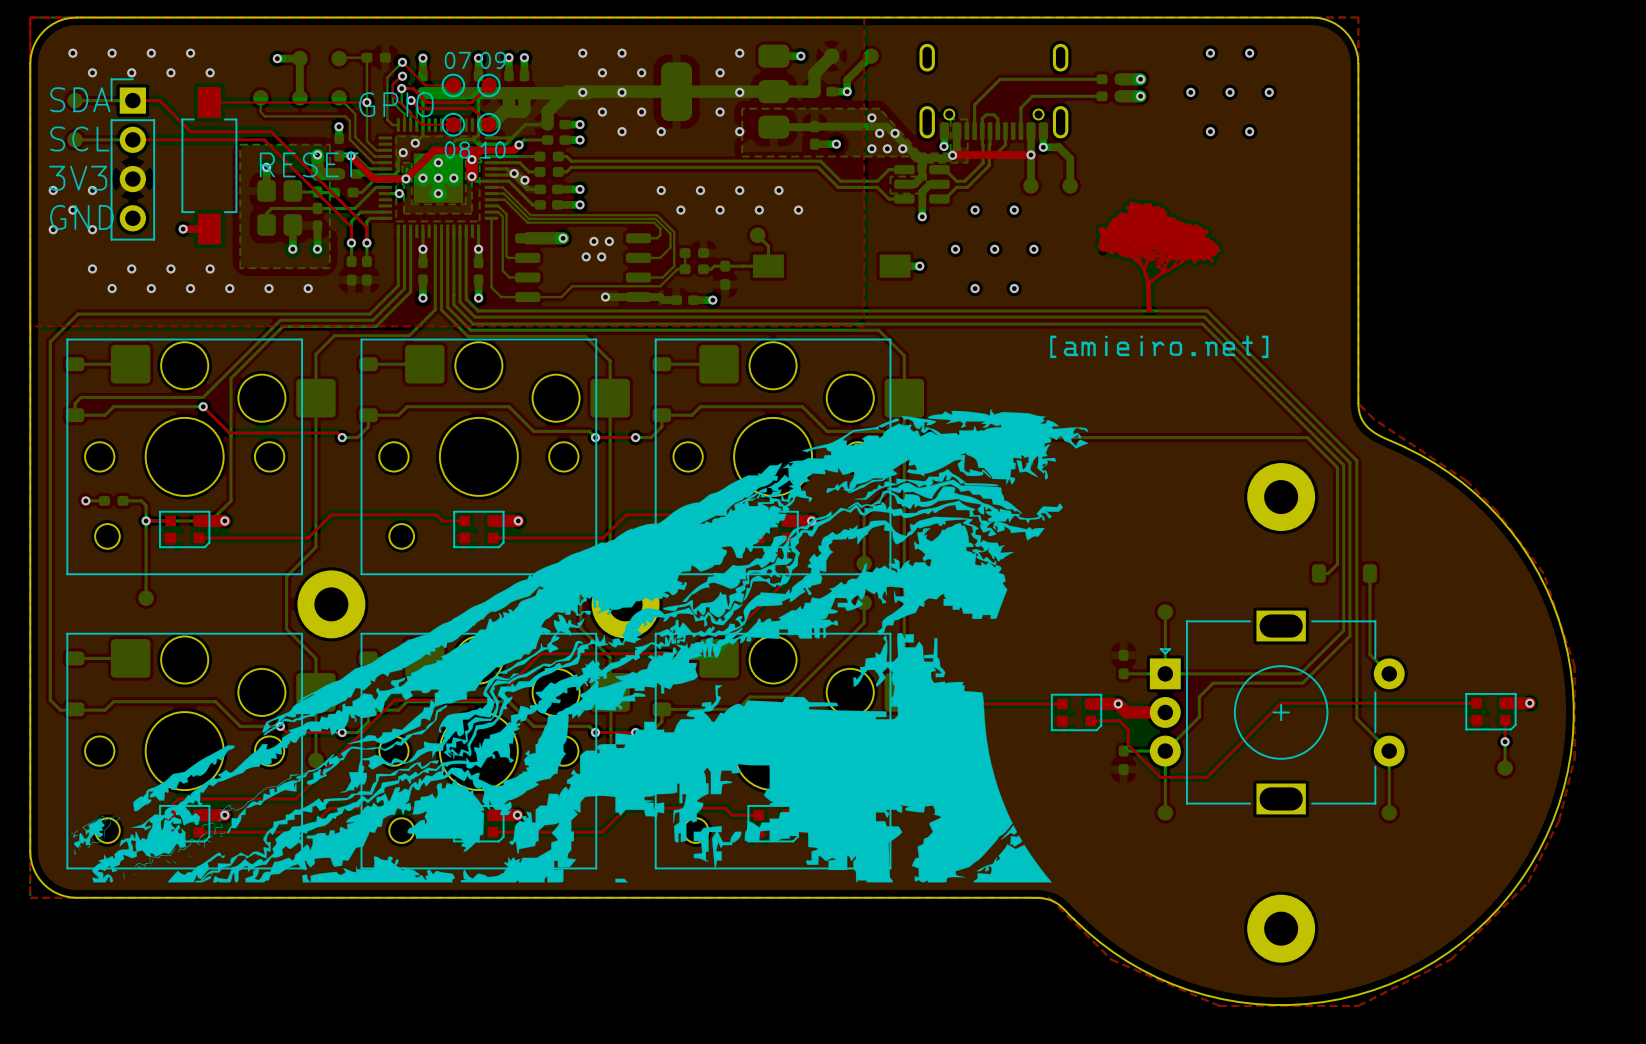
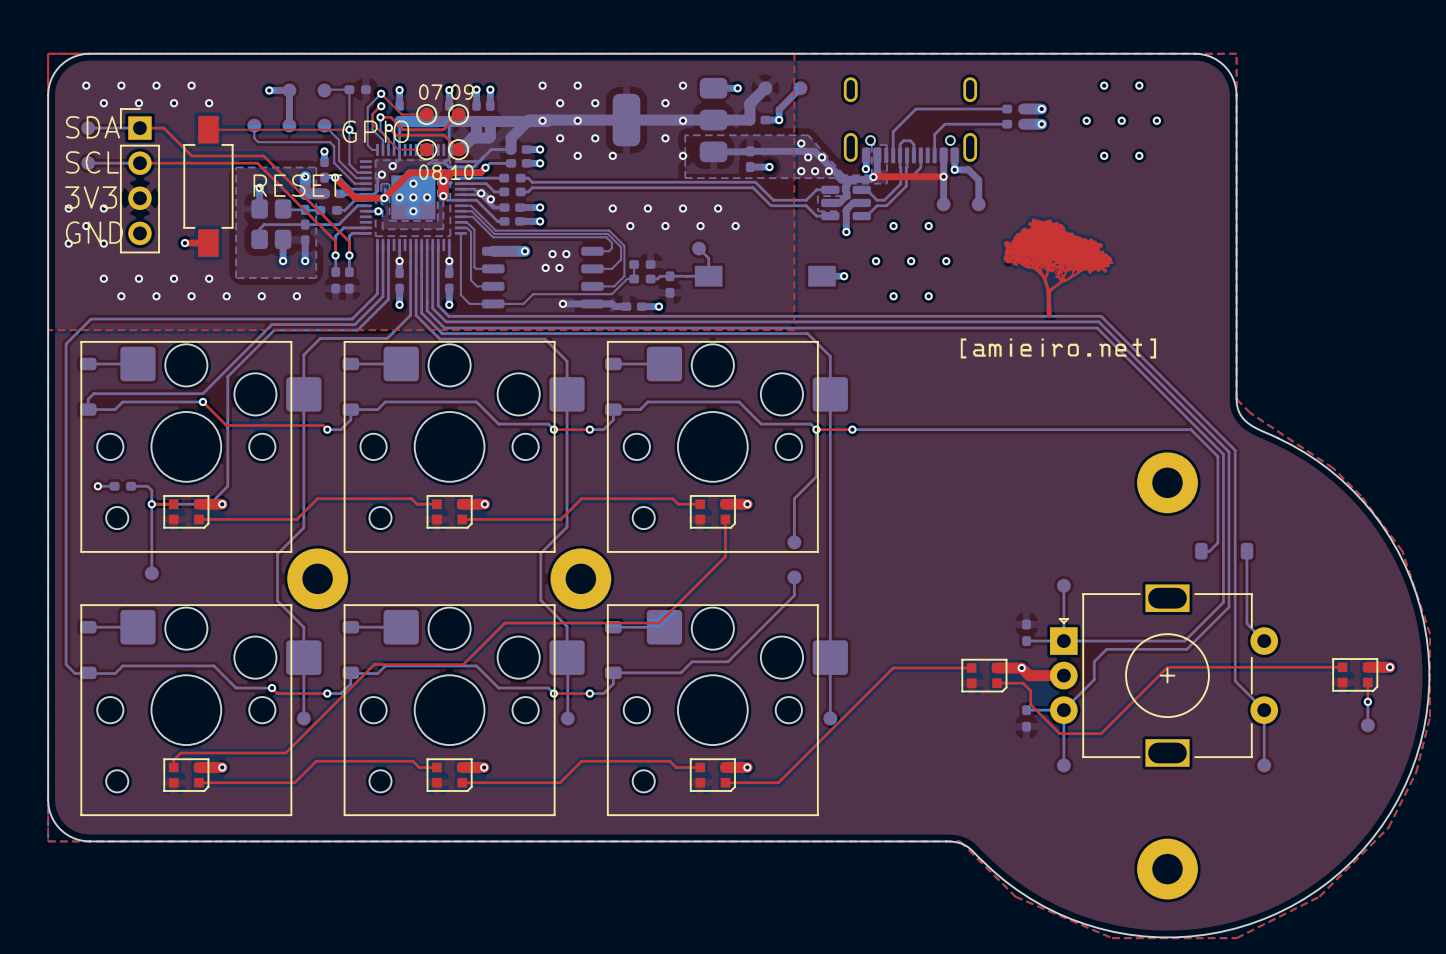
drawing: [68, 409, 1089, 883] -> none

